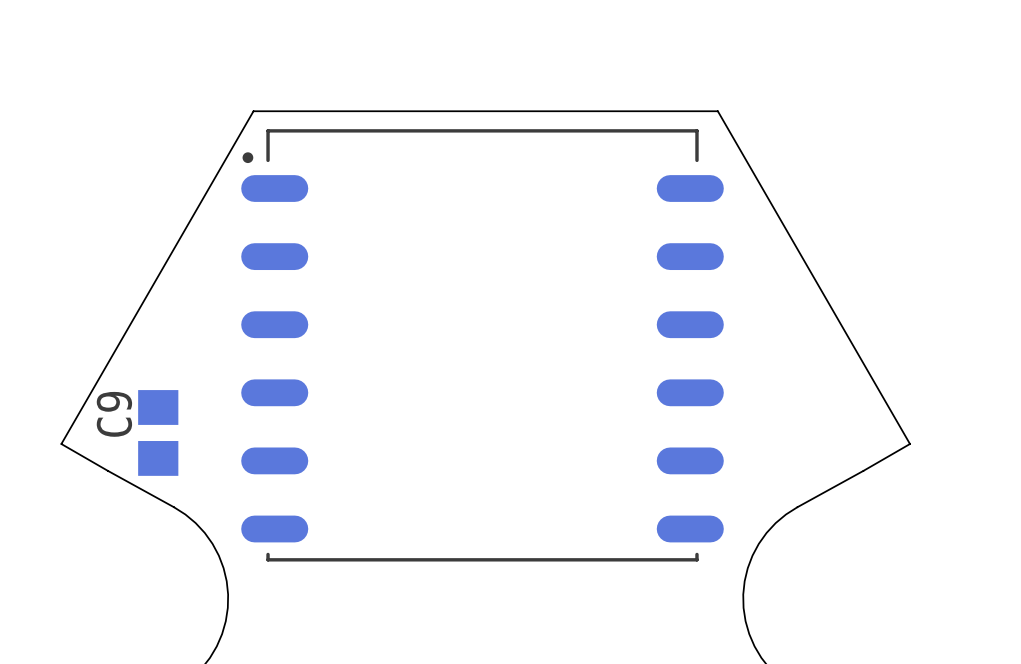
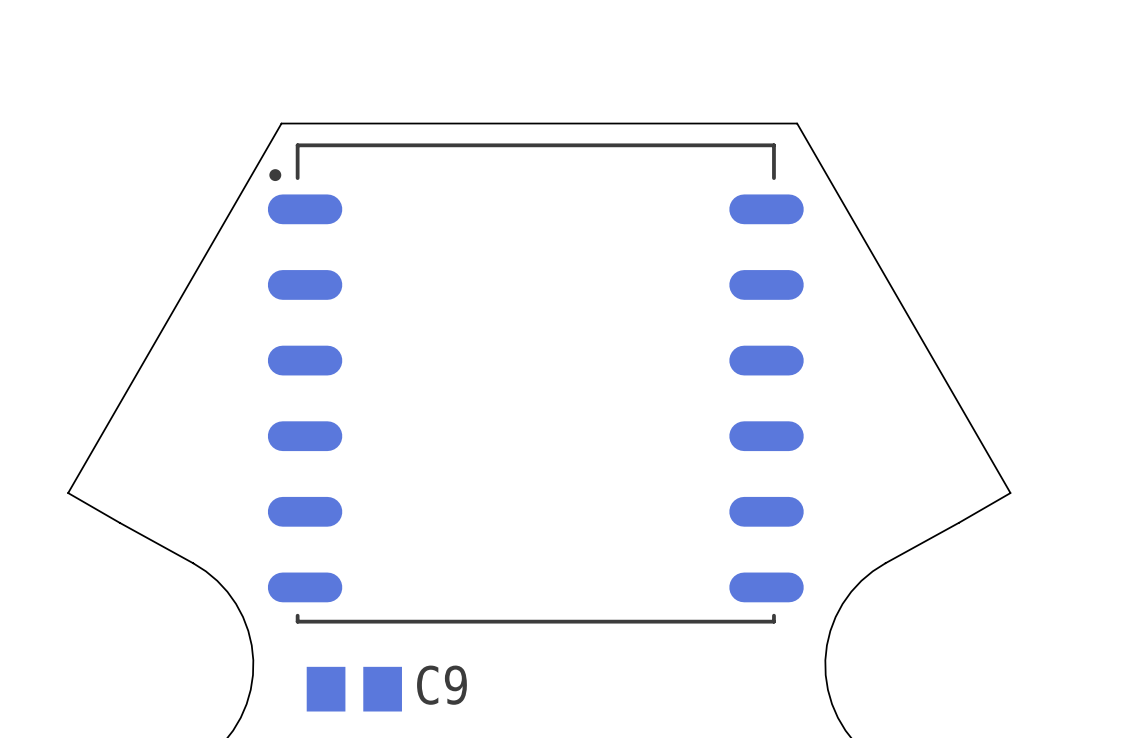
C9 name position: C9 (114, 414) -> C9 (441, 685)
C9 rotation: 0° (158, 432) -> 90° clockwise (354, 689)
C9 position: (158, 432) -> (354, 689)

